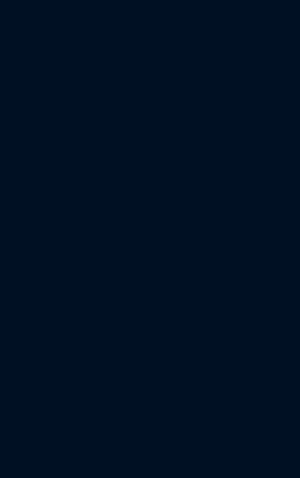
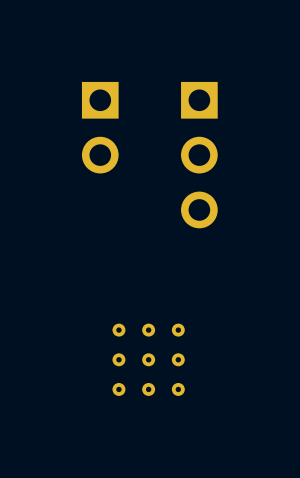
part: none -> (100, 127)
part: none -> (199, 155)
part: none -> (148, 359)

